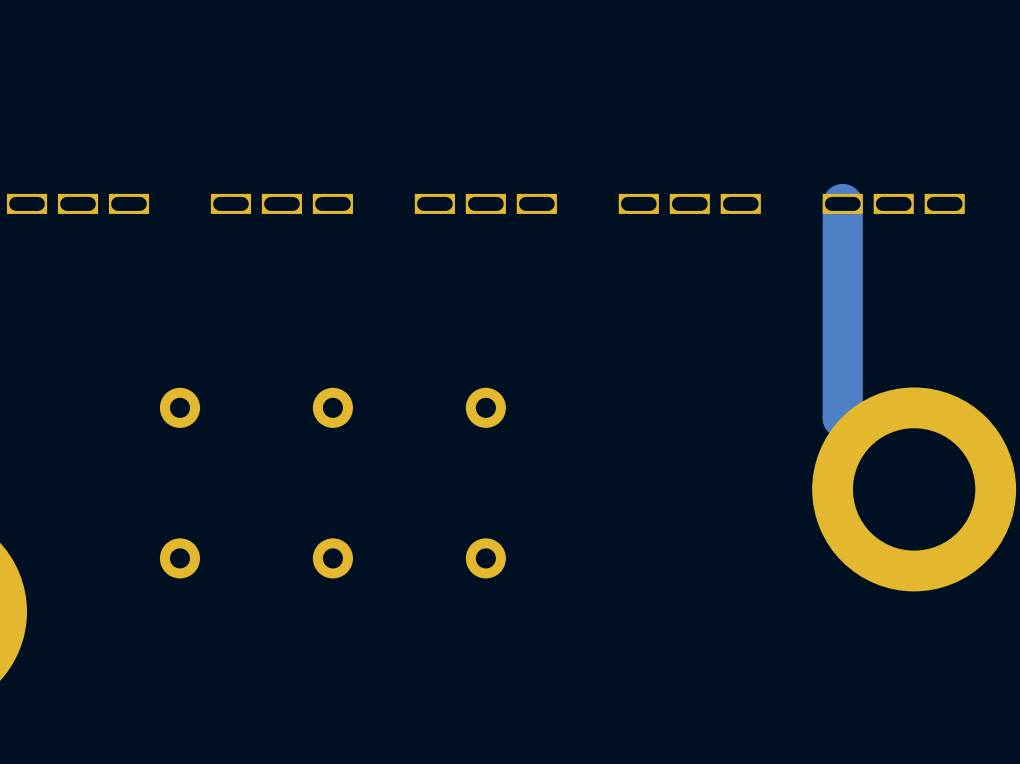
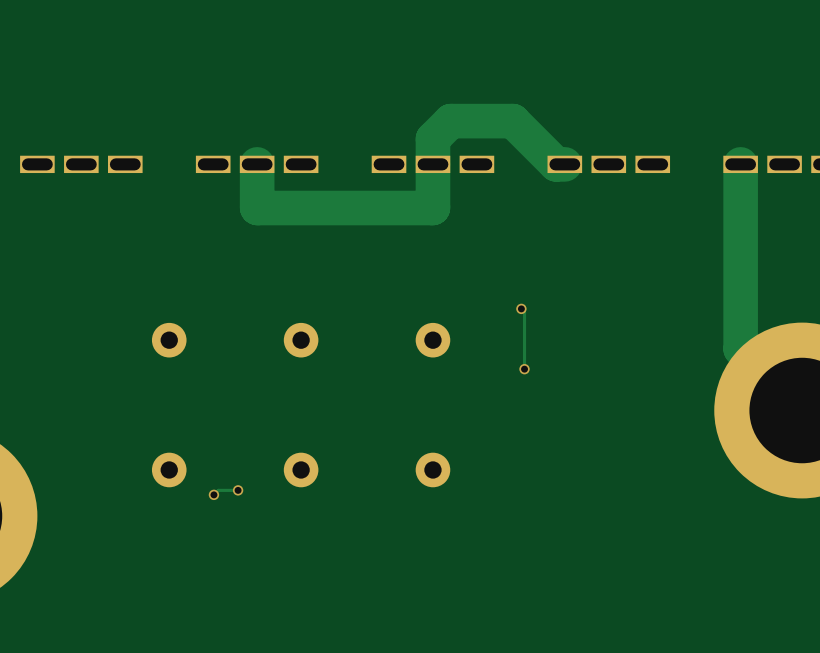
track: none -> (564, 164) (556, 164) (512, 121) (450, 121) (432, 138) (432, 208) (257, 208) (257, 164)
track: none -> (521, 308) (524, 312) (524, 369)
via: none -> (521, 308)
via: none -> (524, 369)
track: none -> (238, 490) (218, 490) (213, 494)
via: none -> (238, 490)
via: none -> (213, 494)

